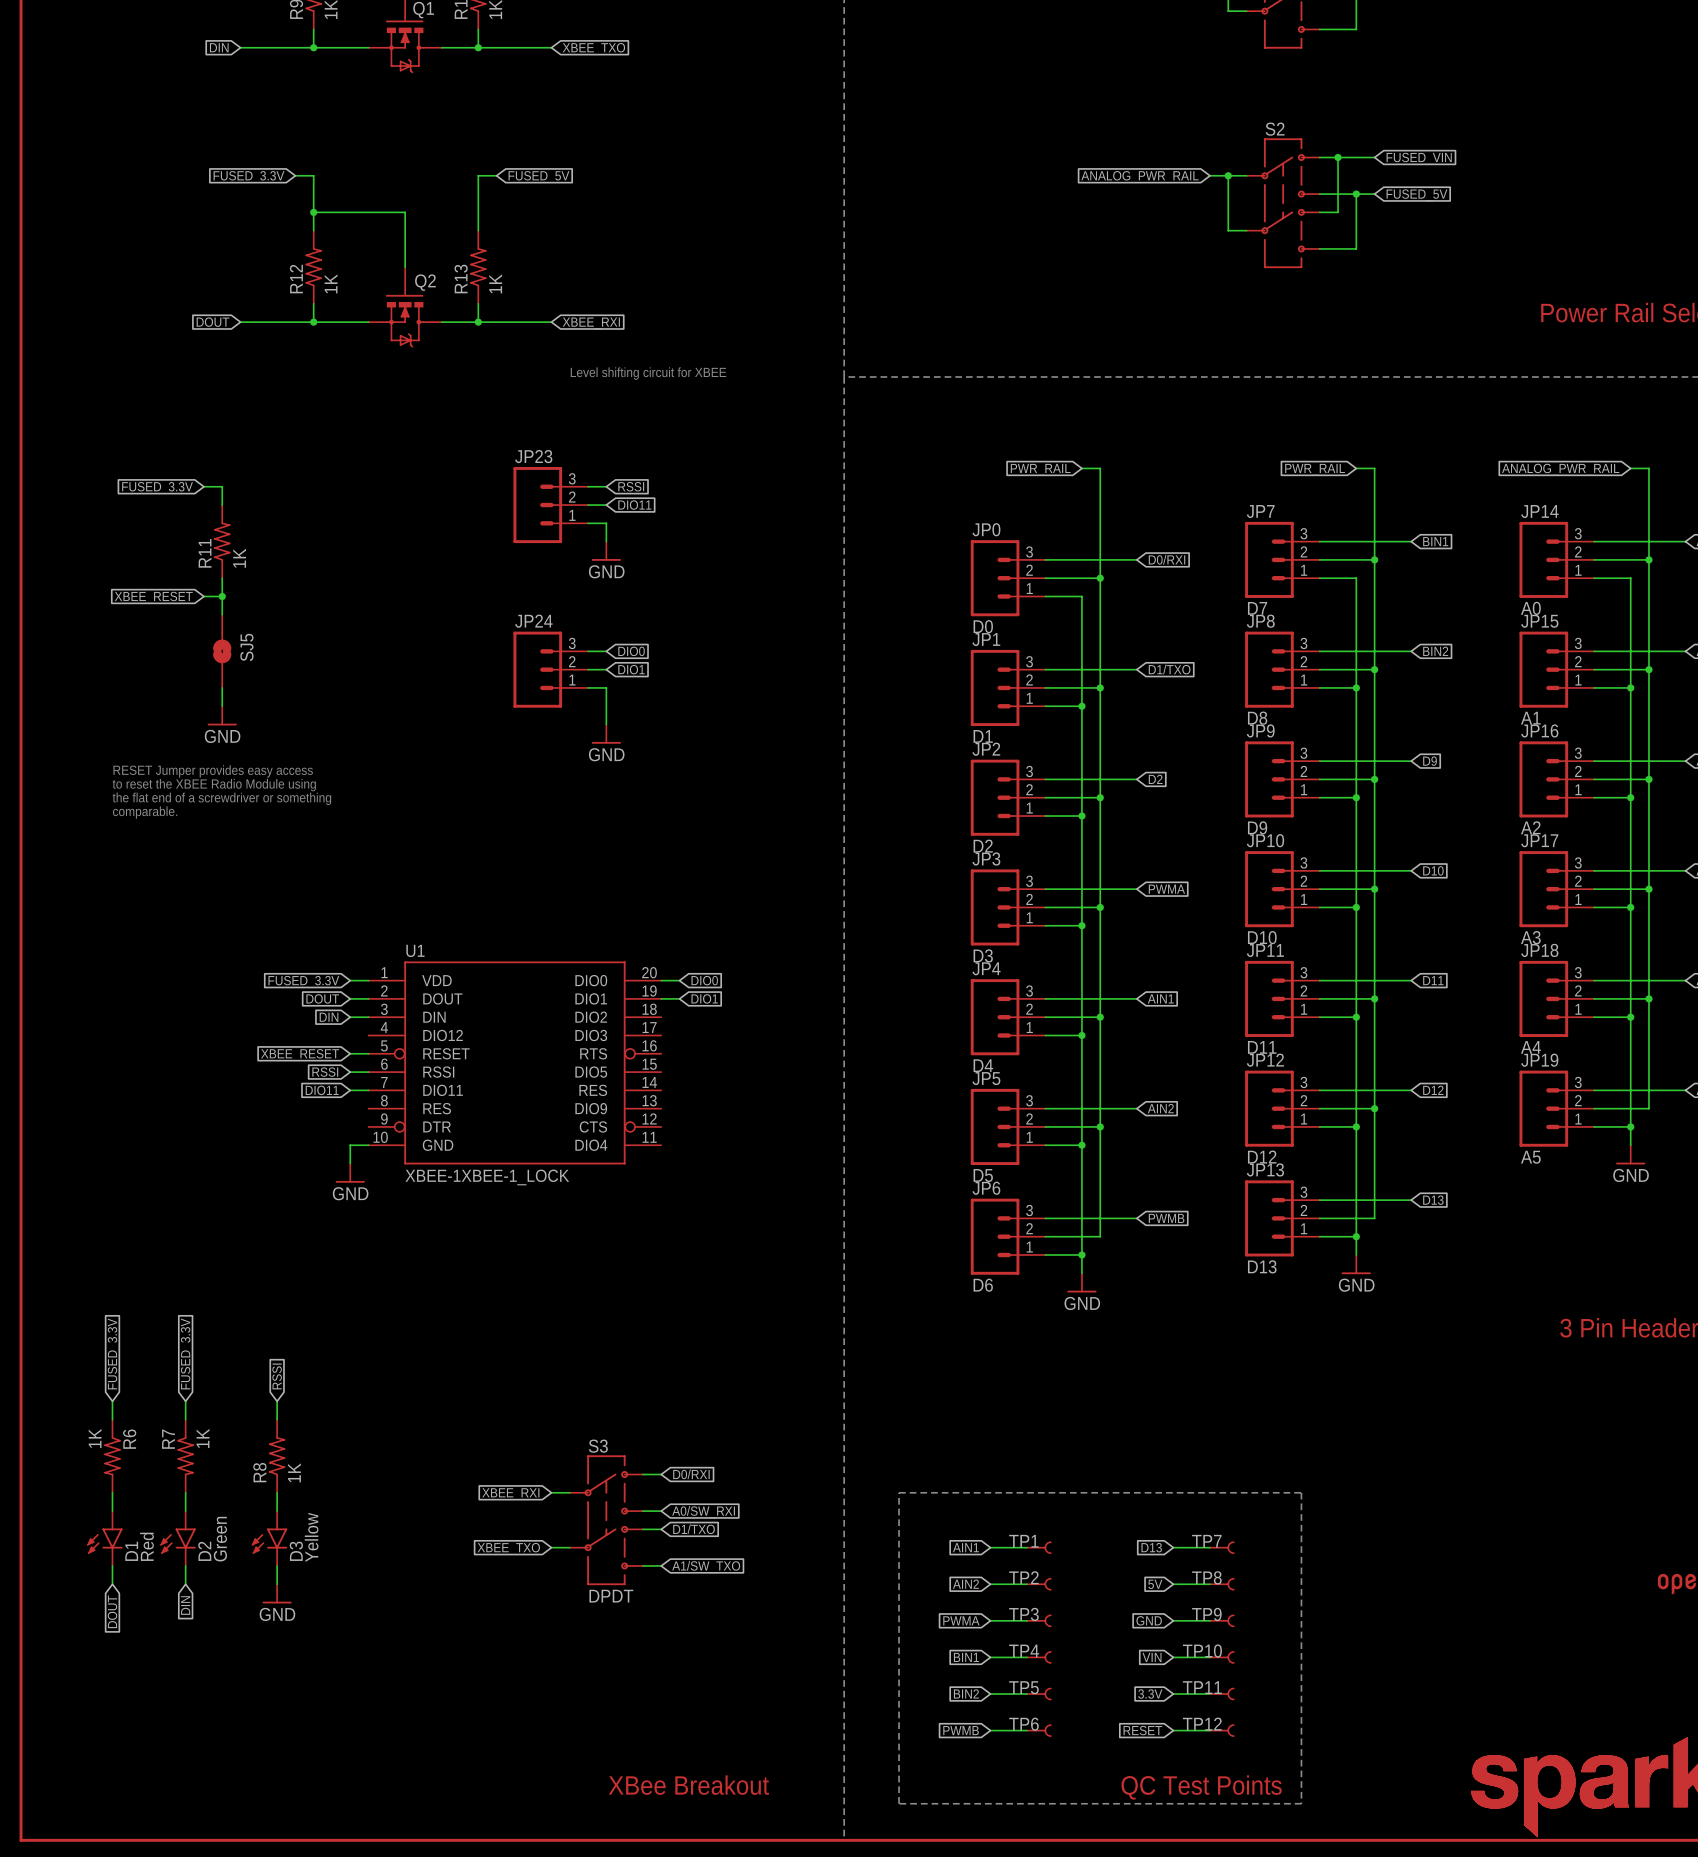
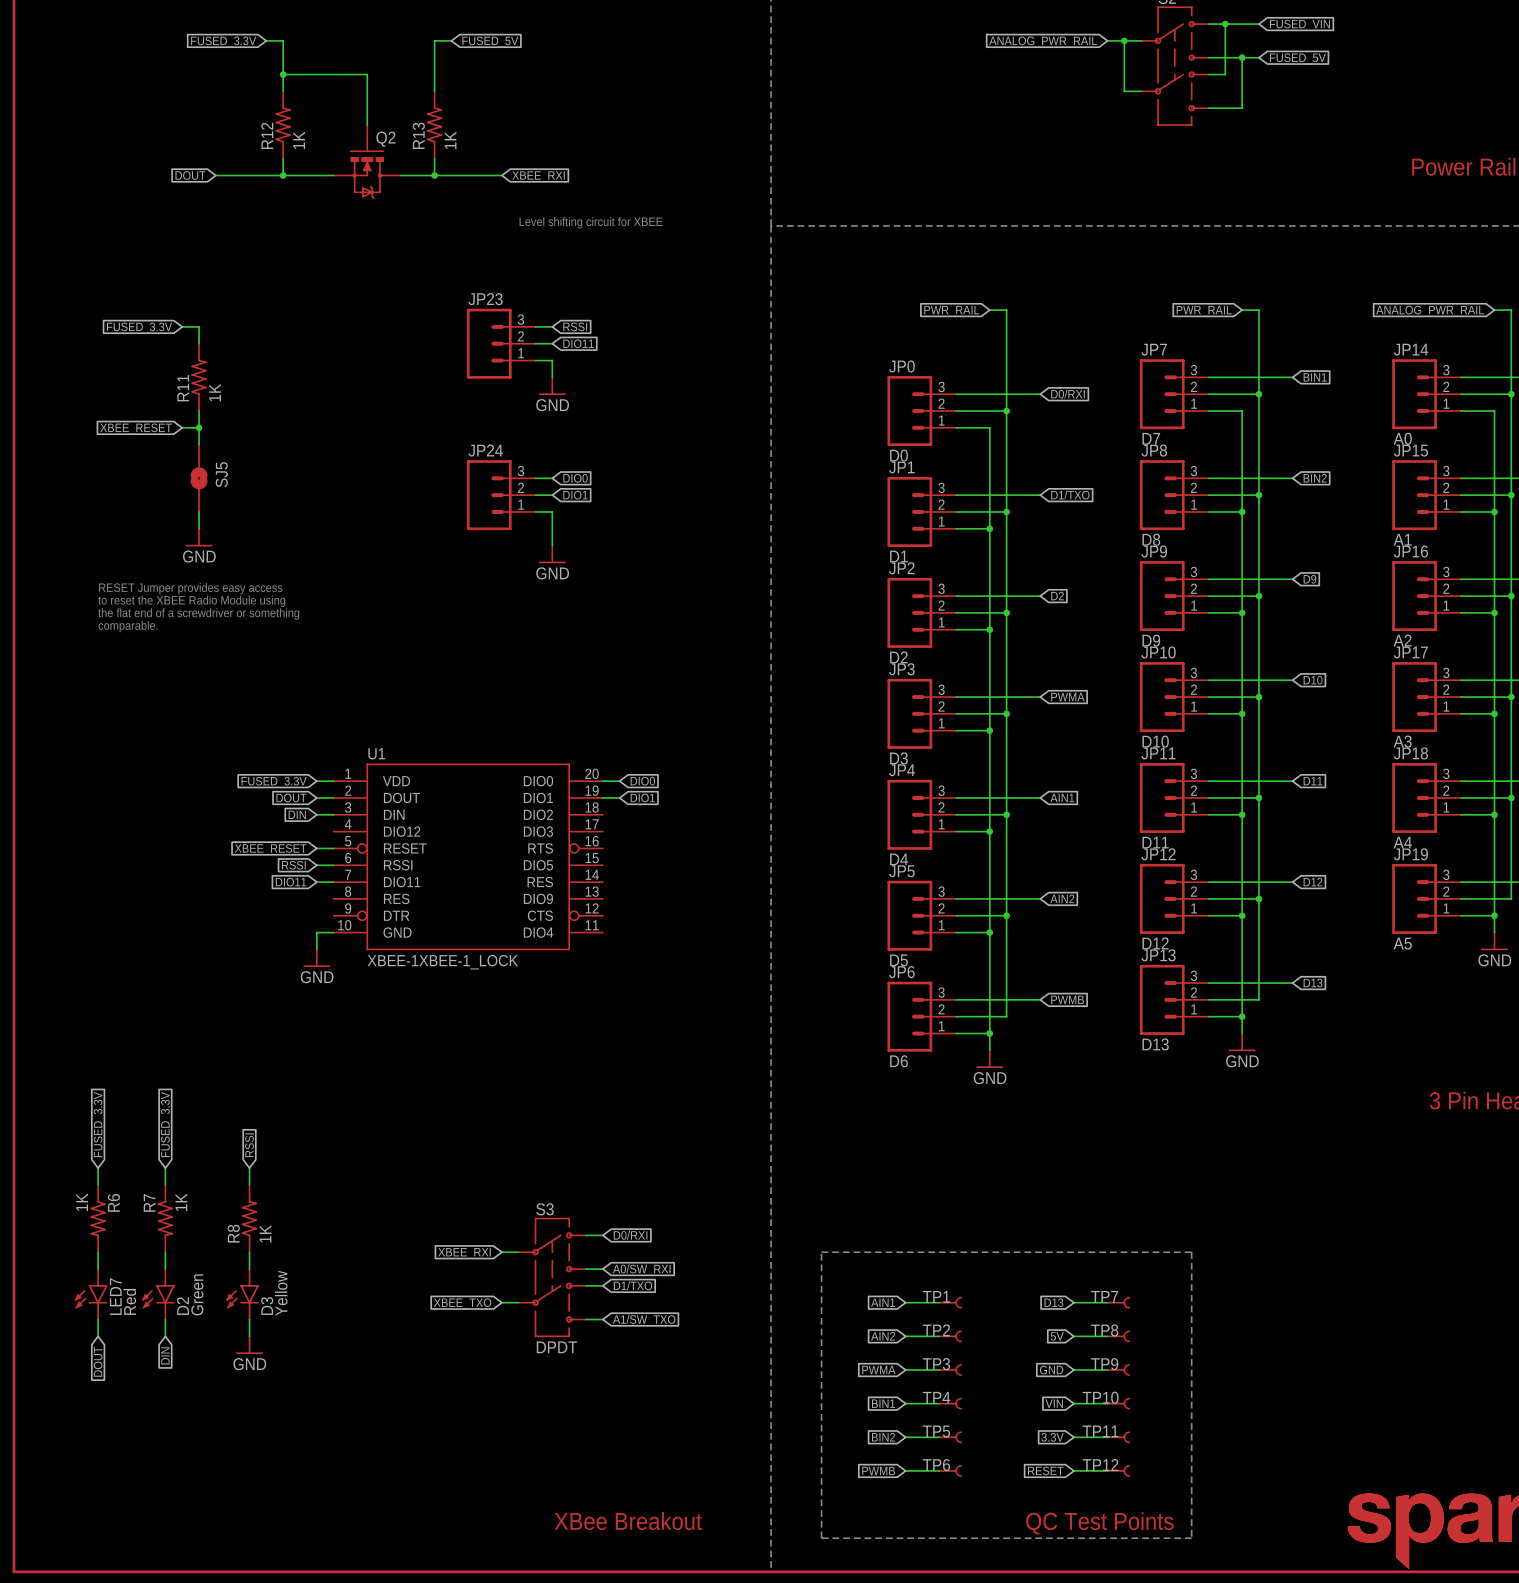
D1 name: D1 (131, 1551) -> LED7 (115, 1296)

